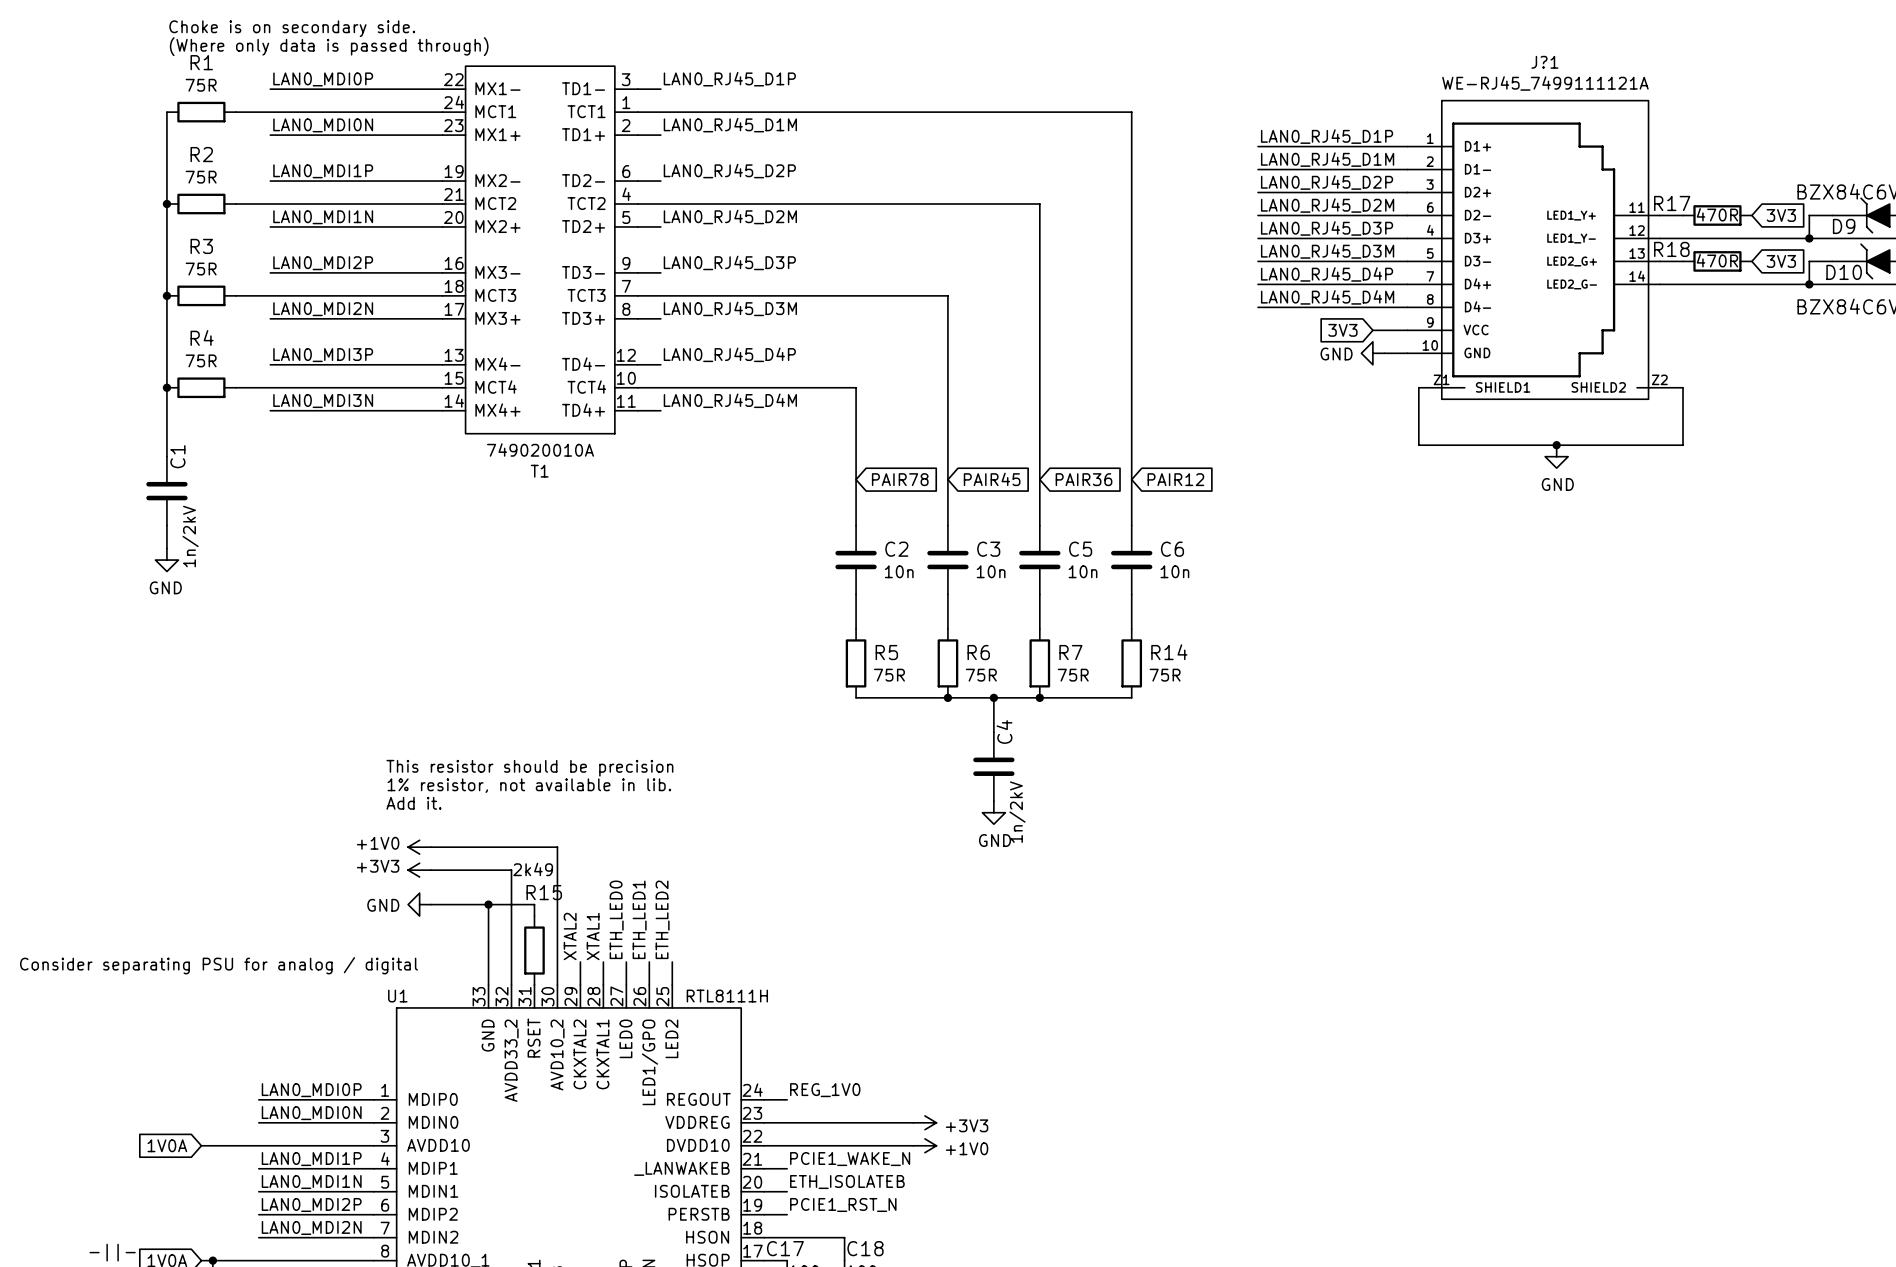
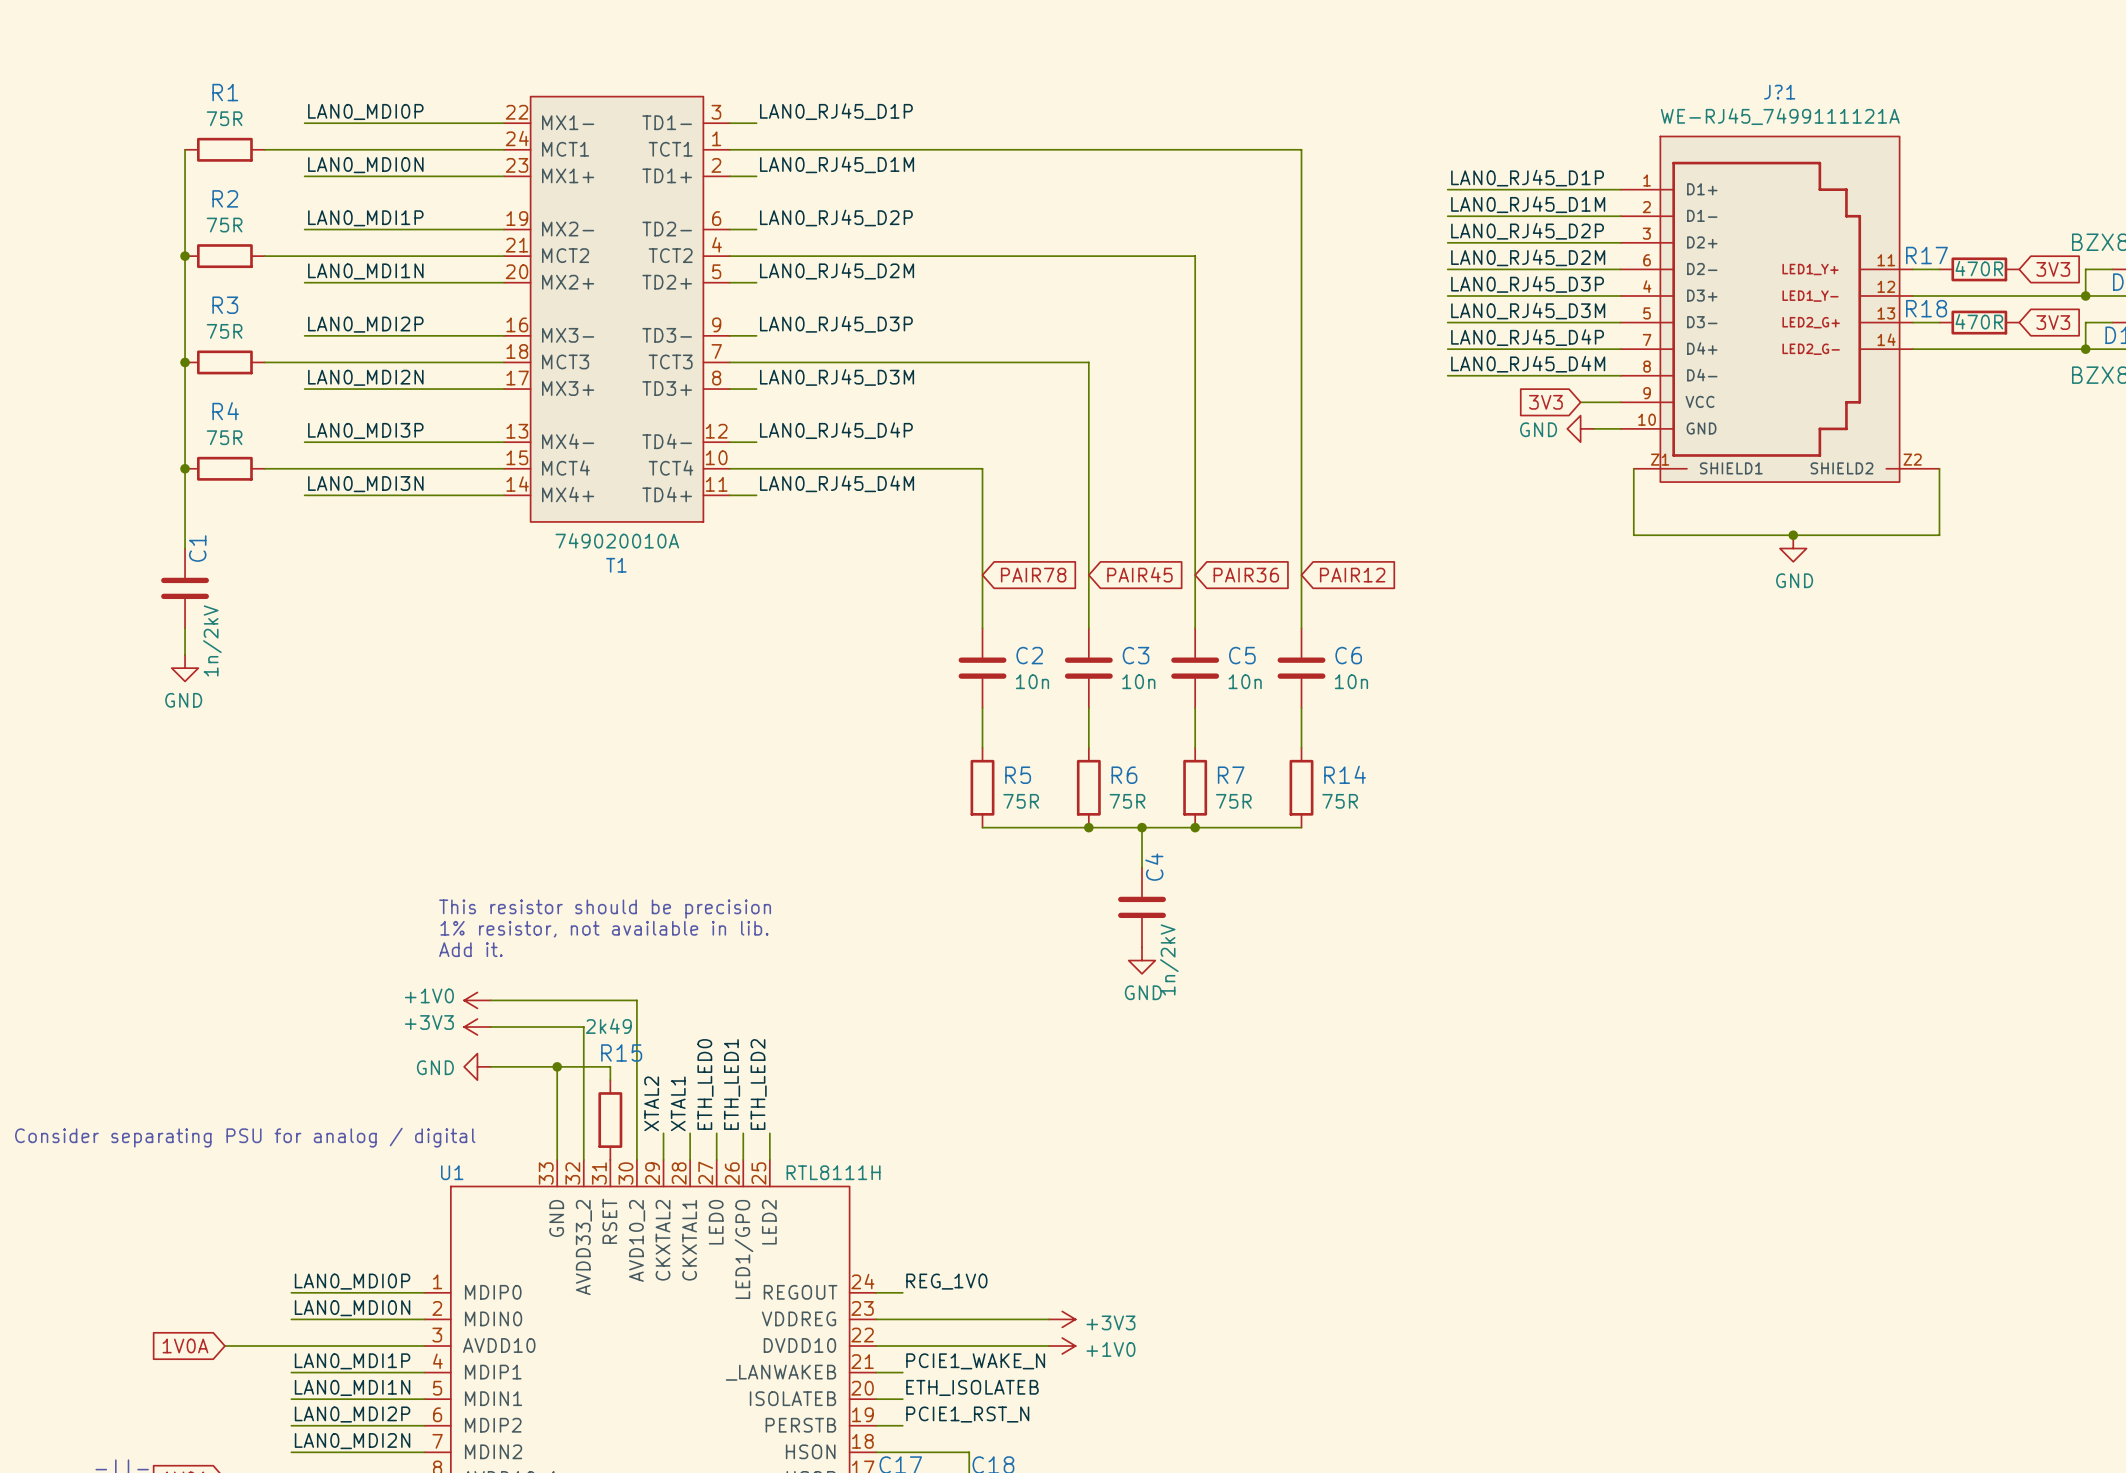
text: Choke is on secondary side. (292, 28) -> none
text: (Where only data is passed through) (329, 46) -> none

